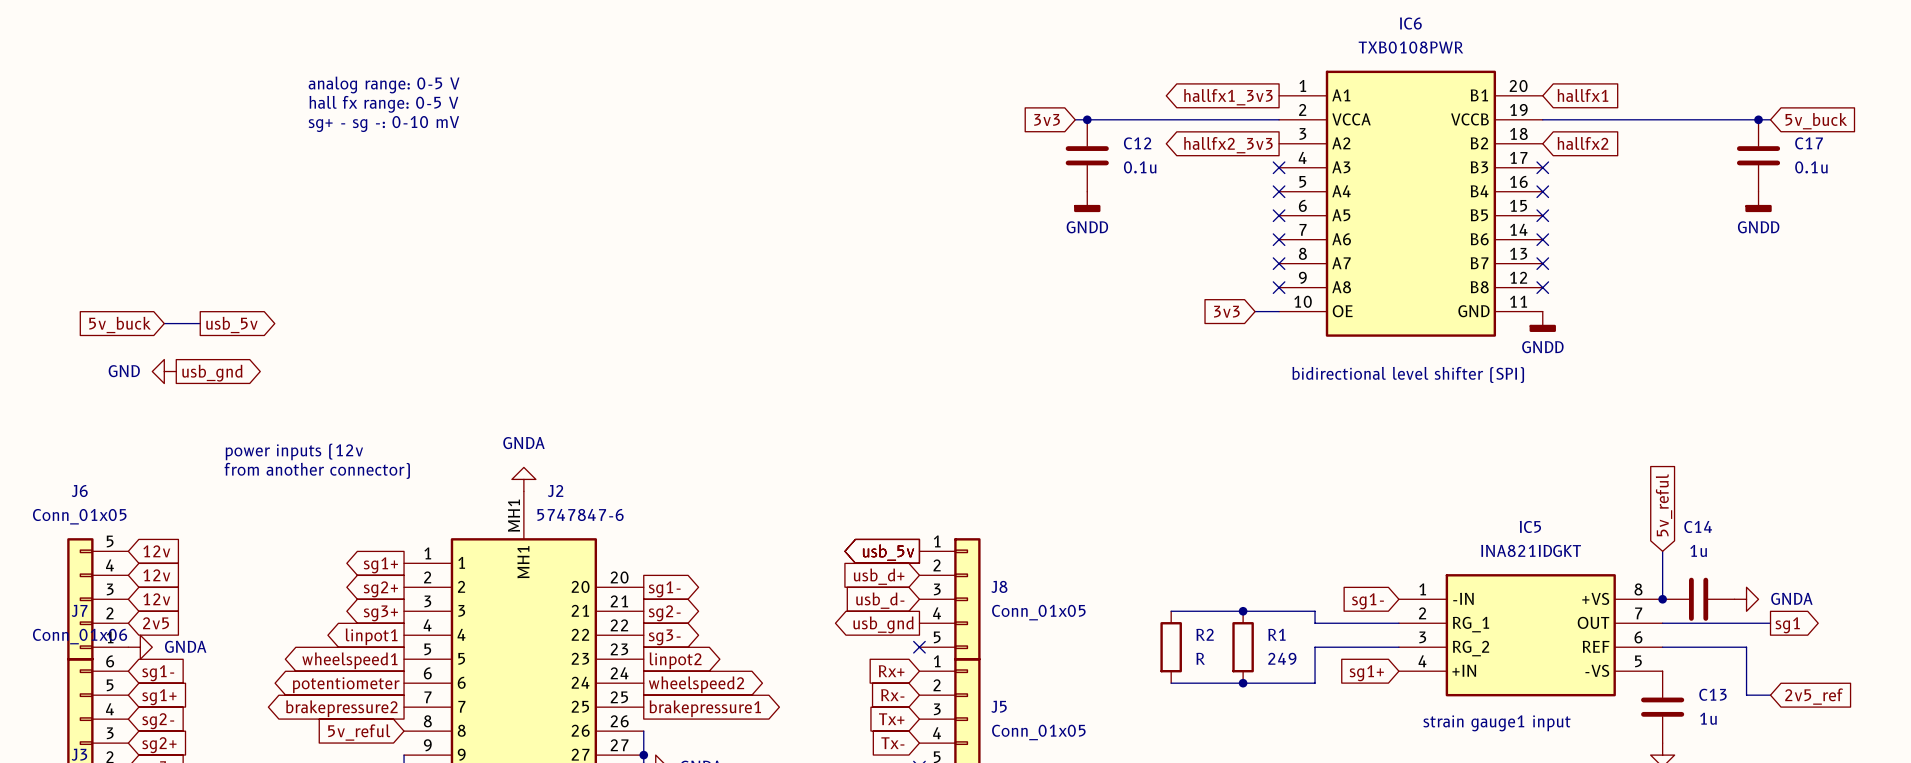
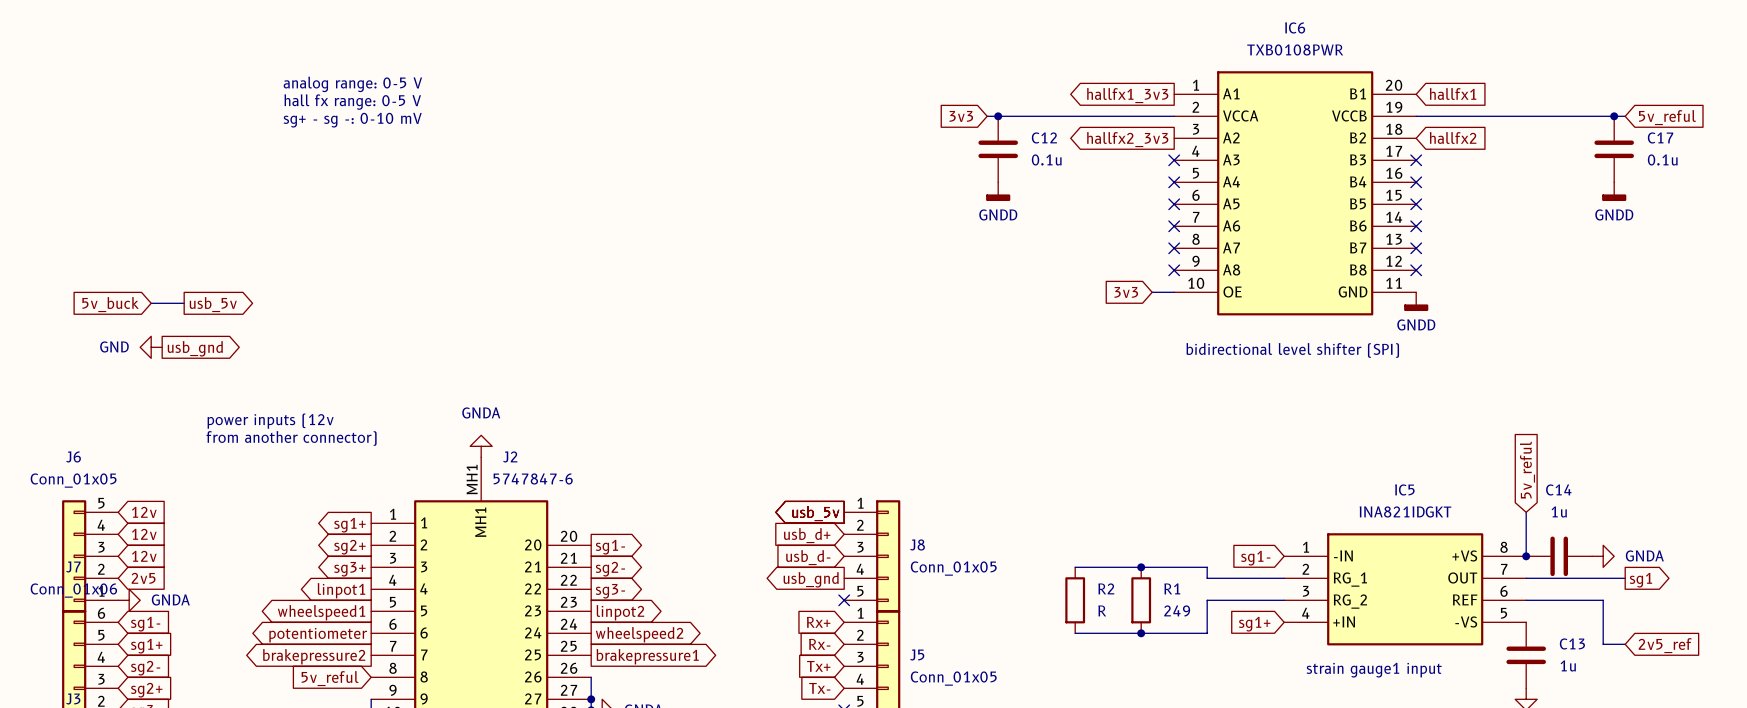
global label: 5v_buck (1816, 121) -> 5v_reful (1667, 117)

